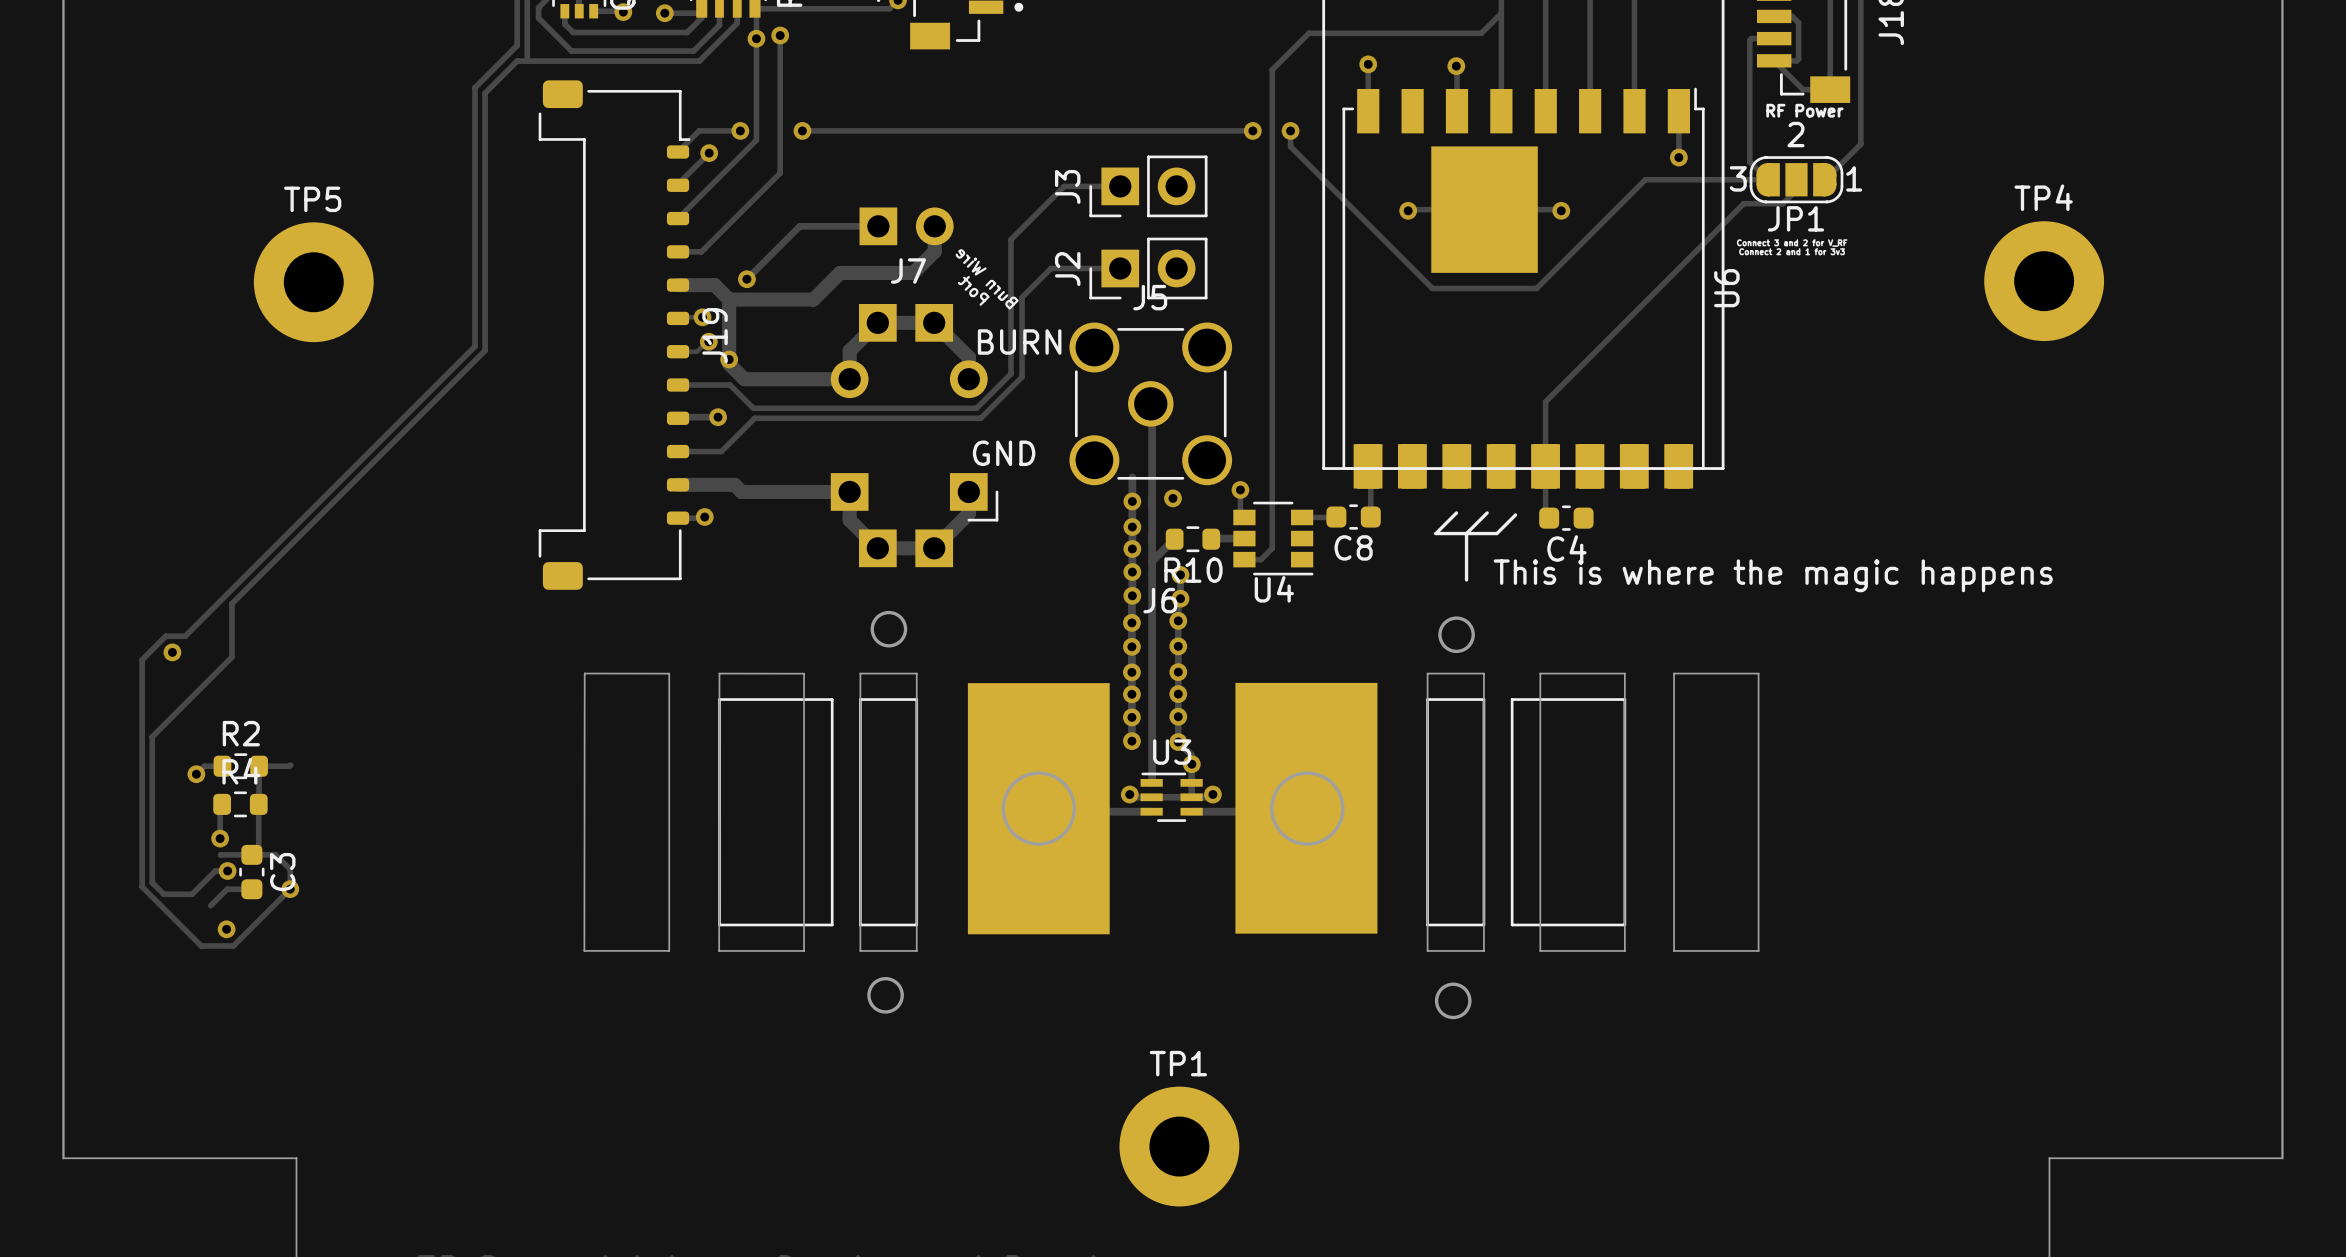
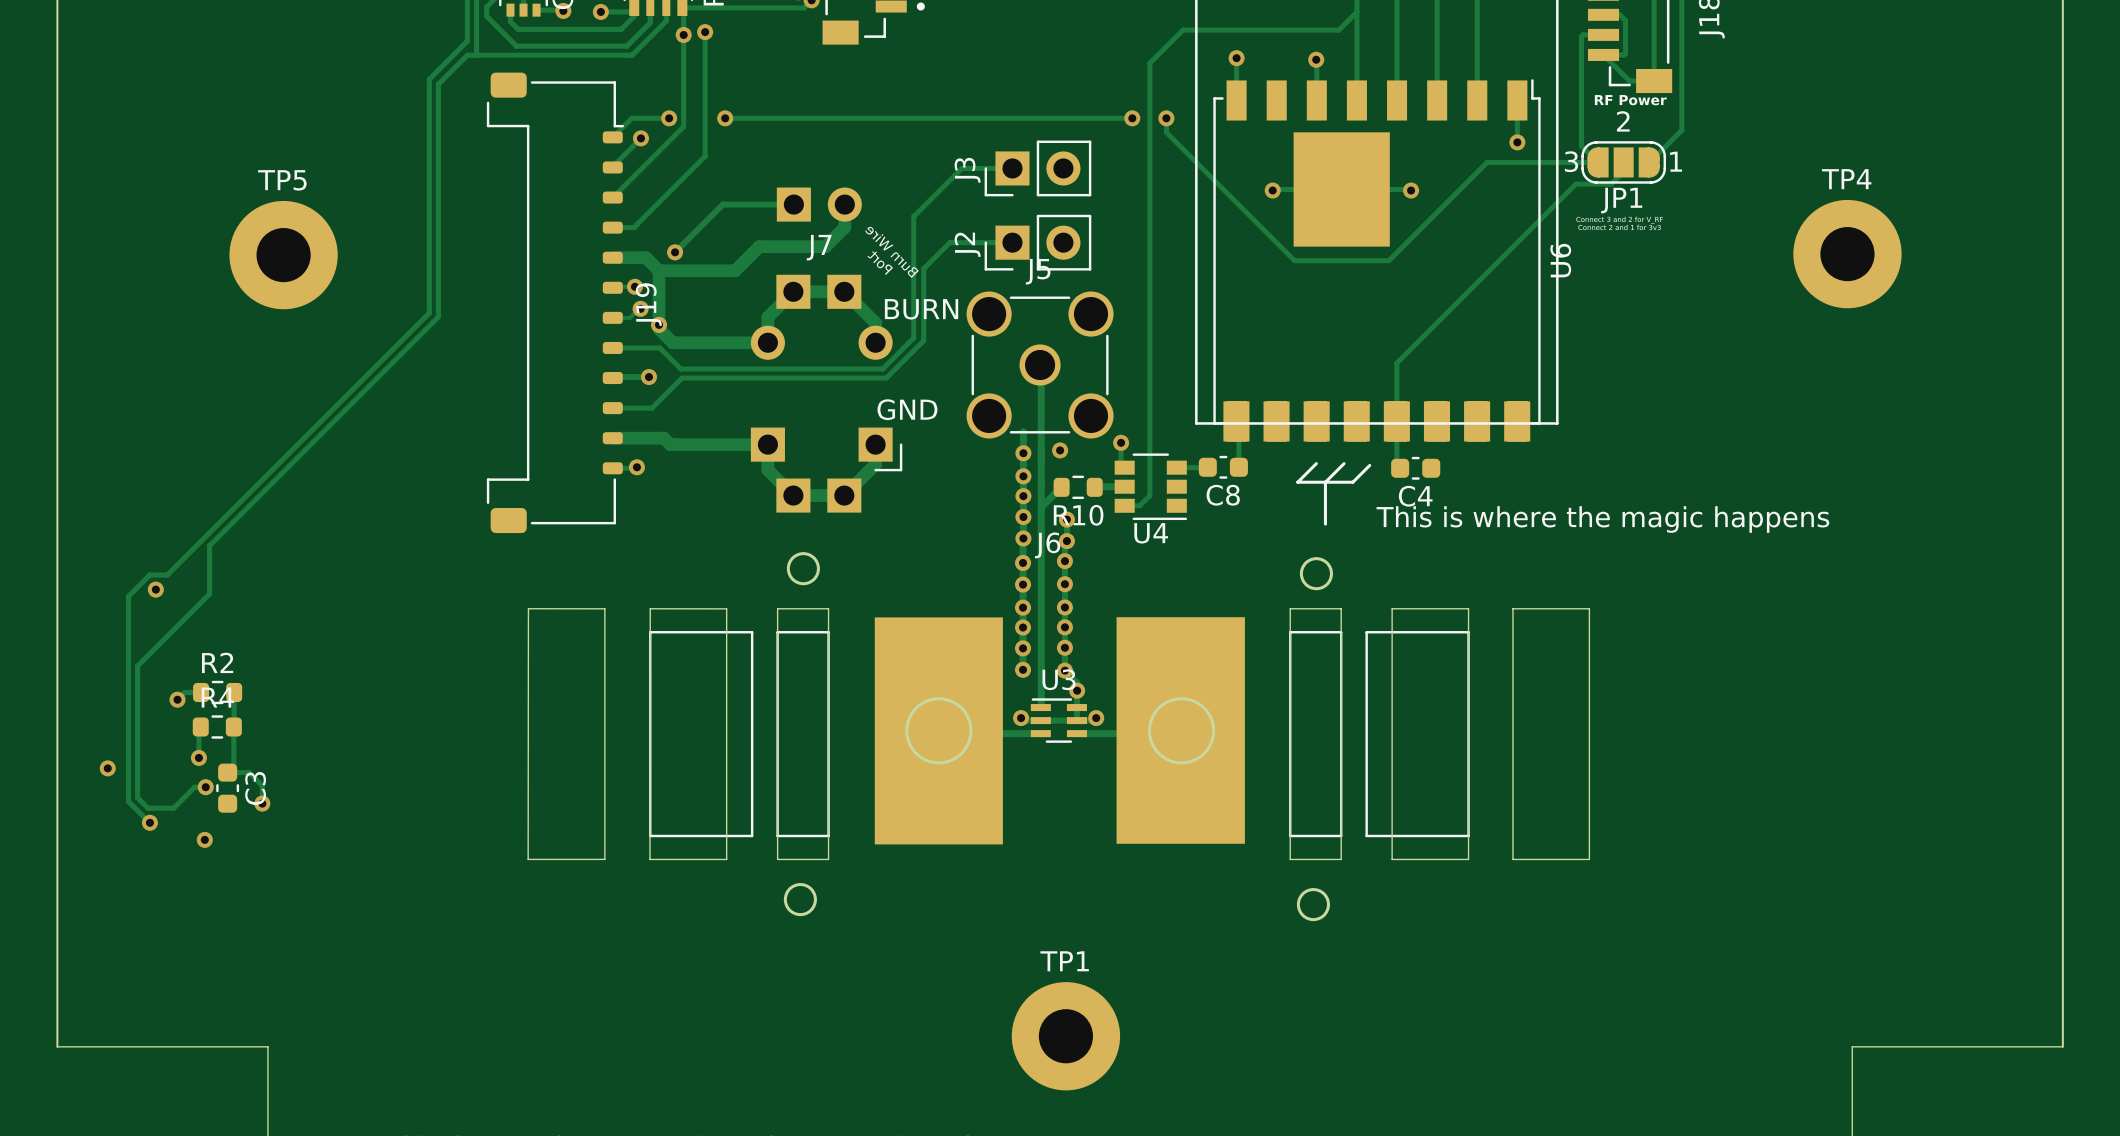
track: (290, 765) (259, 766) -> none
via: none -> (107, 768)
track: (220, 854) (251, 854) -> none
track: (251, 889) (227, 889) (210, 905) -> none
track: (290, 889) (233, 945) (201, 945) (165, 910) -> none
via: none -> (149, 822)

